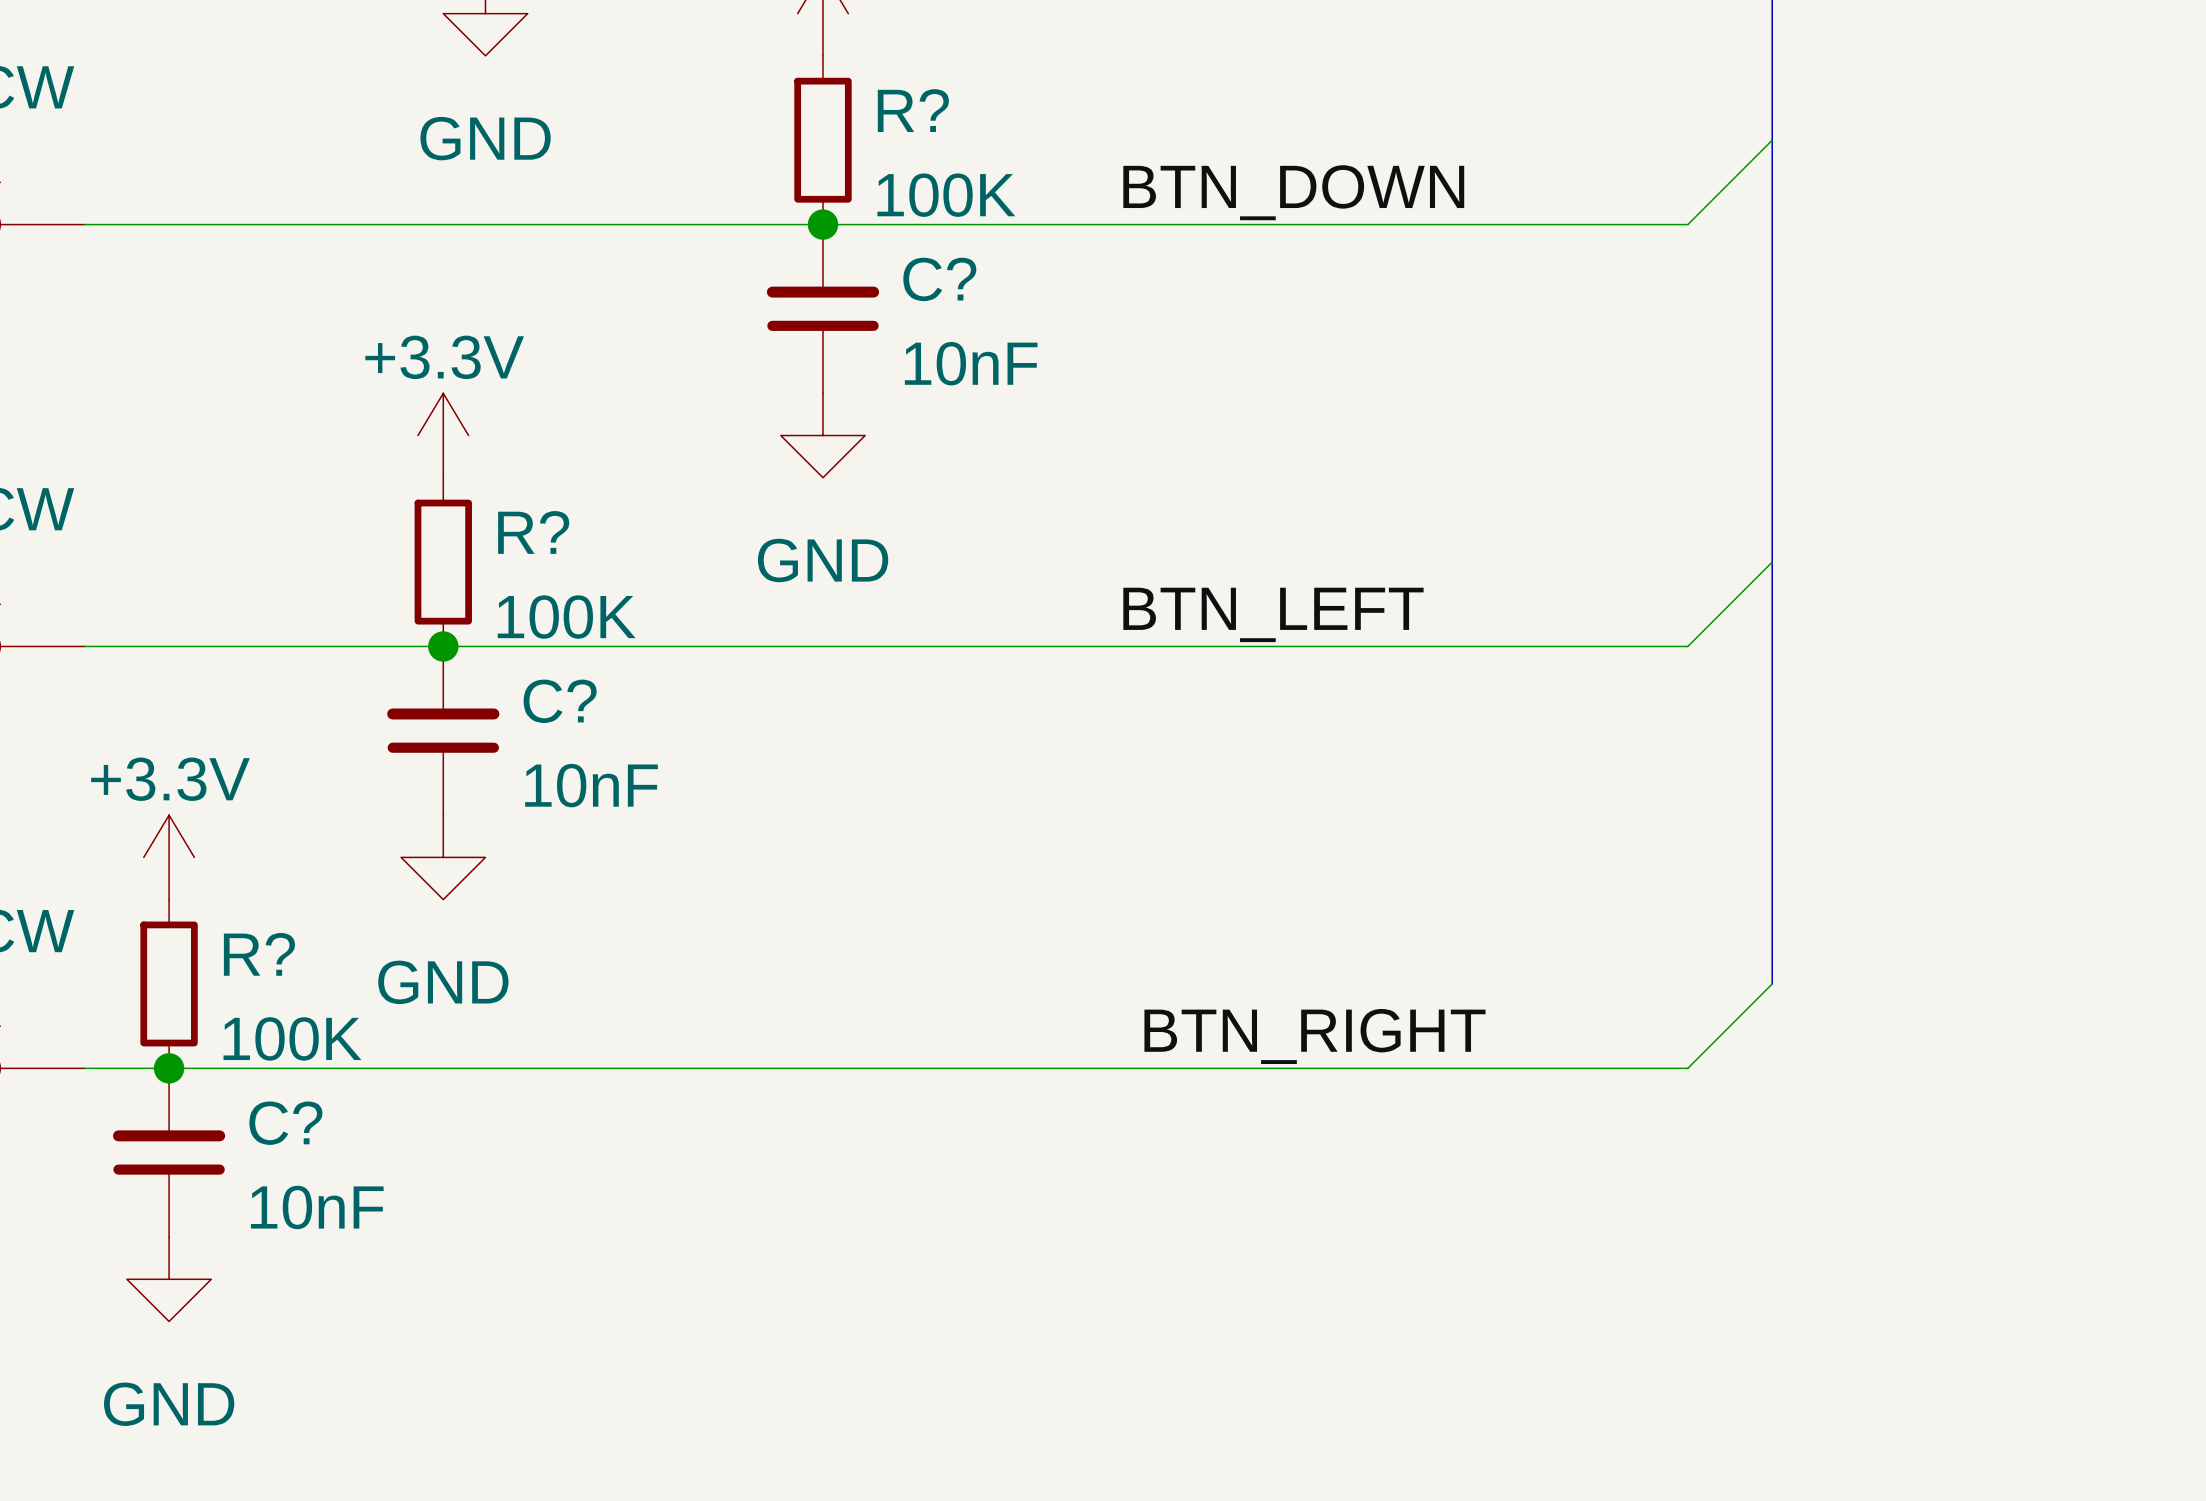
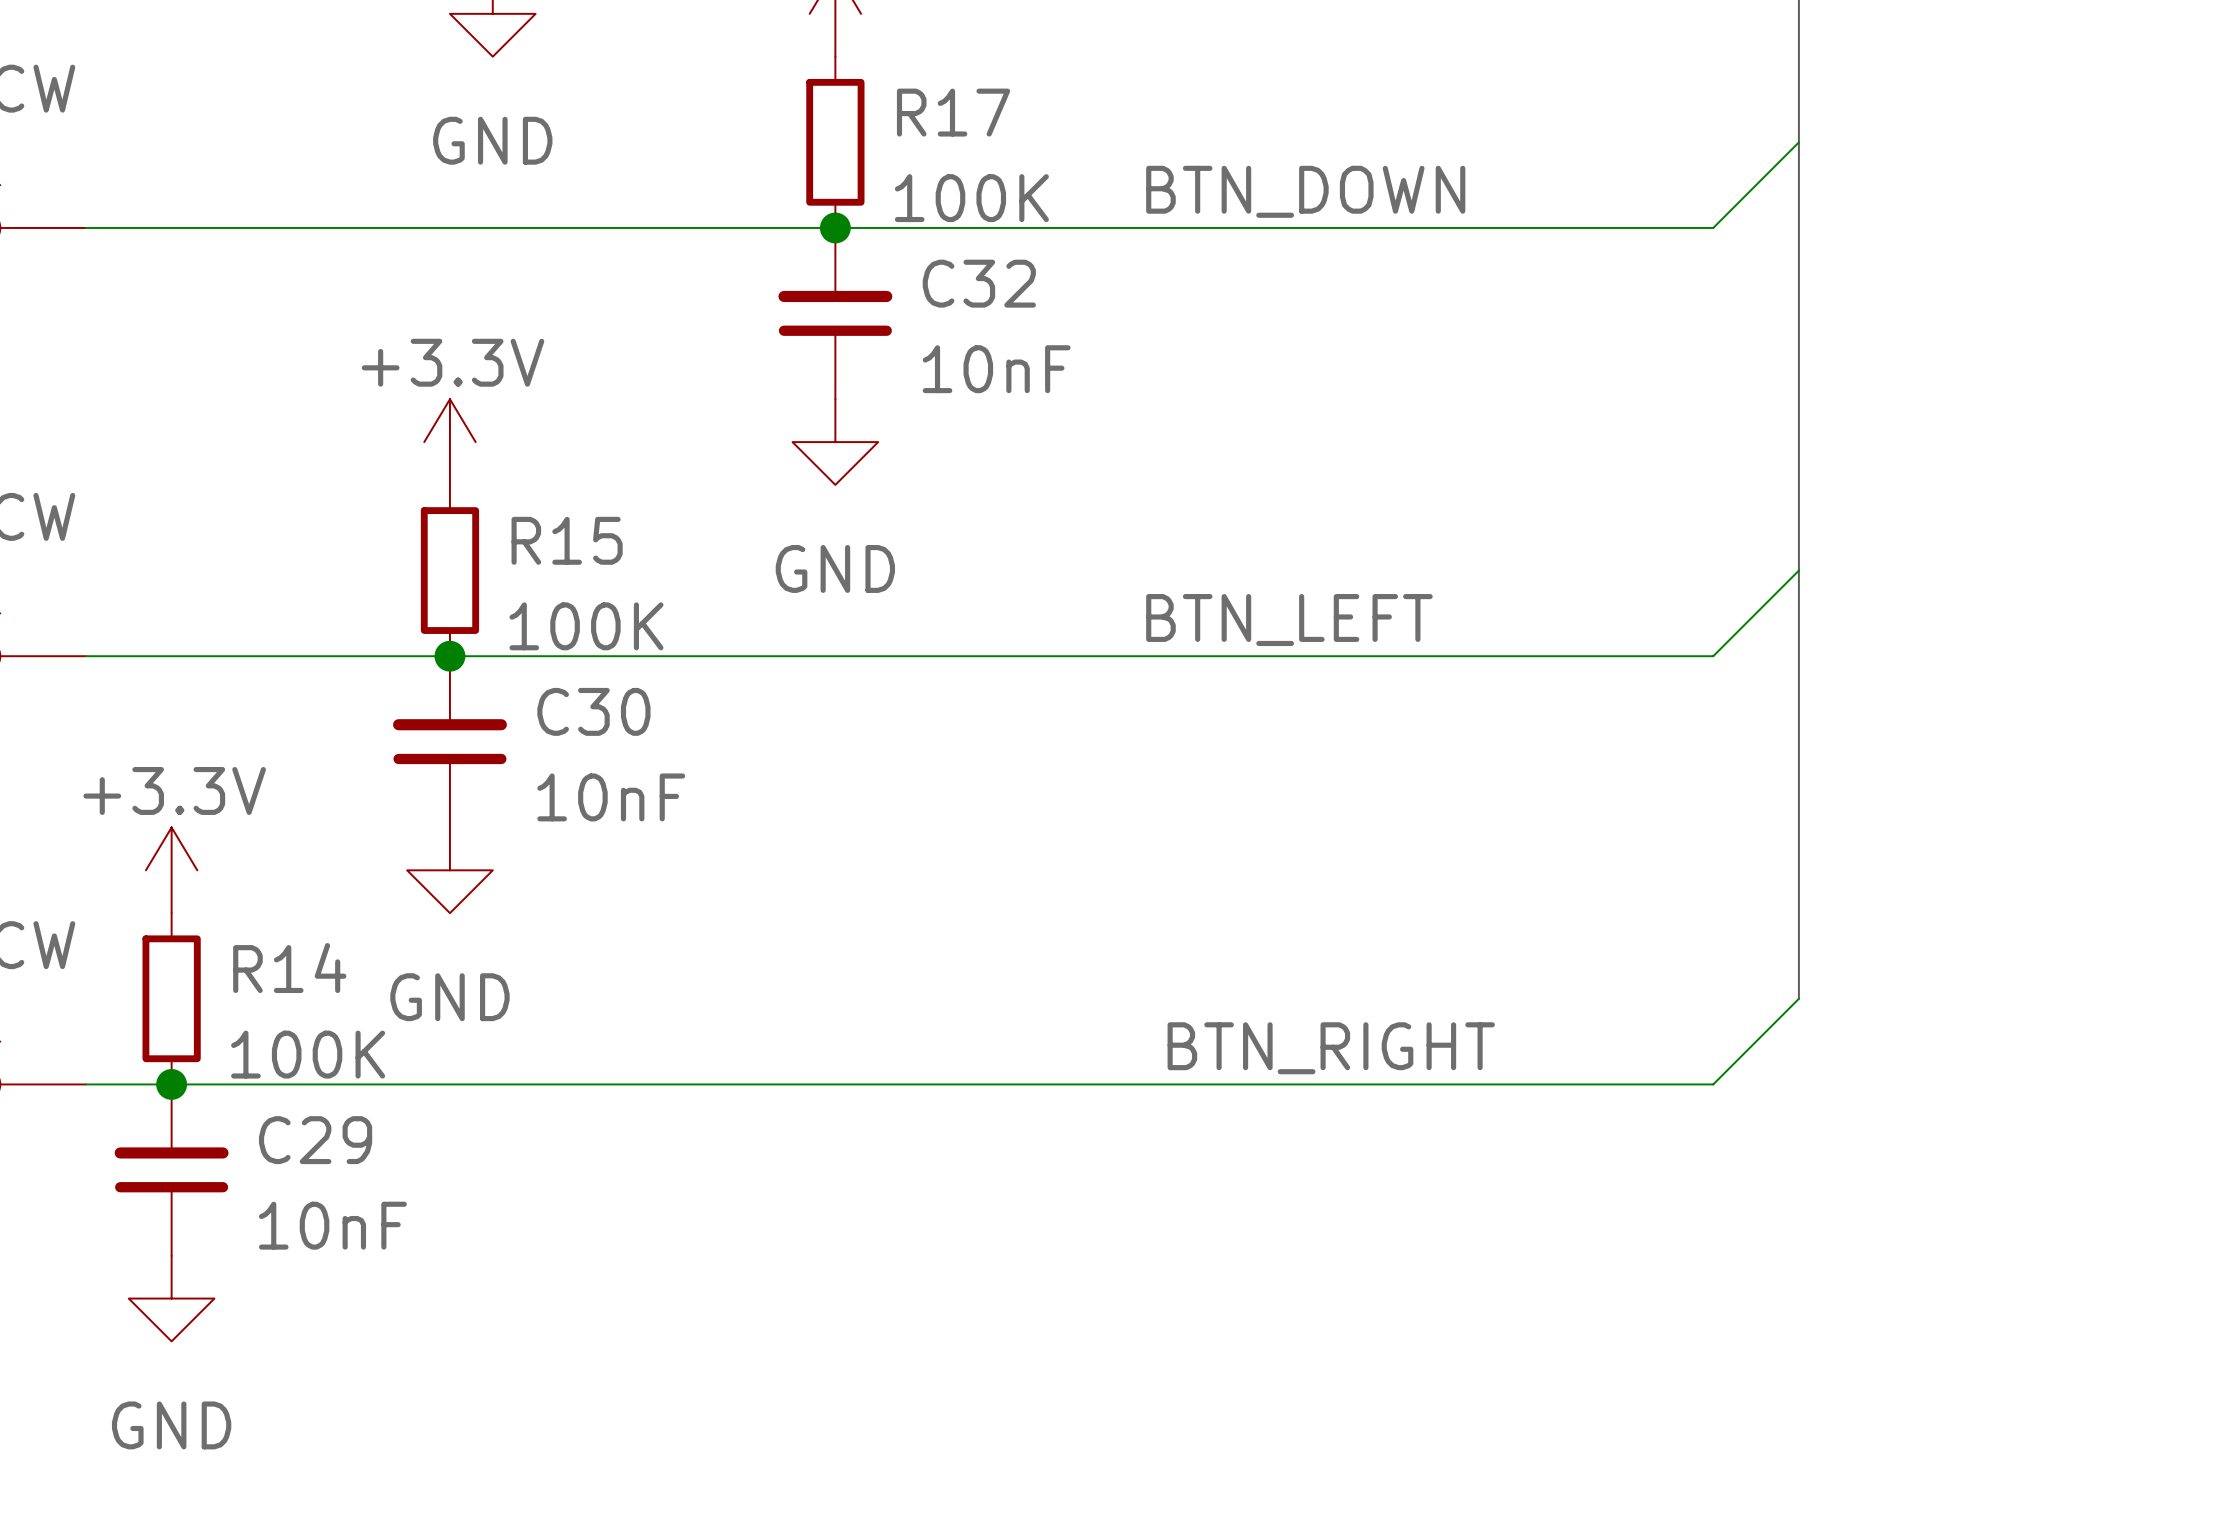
R? name: R? (913, 110) -> R17 (953, 112)
C? name: C? (939, 279) -> C32 (979, 283)
R? name: R? (533, 532) -> R15 (567, 540)
C? name: C? (560, 701) -> C30 (593, 711)
R? name: R? (259, 954) -> R14 (289, 968)
C? name: C? (285, 1123) -> C29 (315, 1140)

